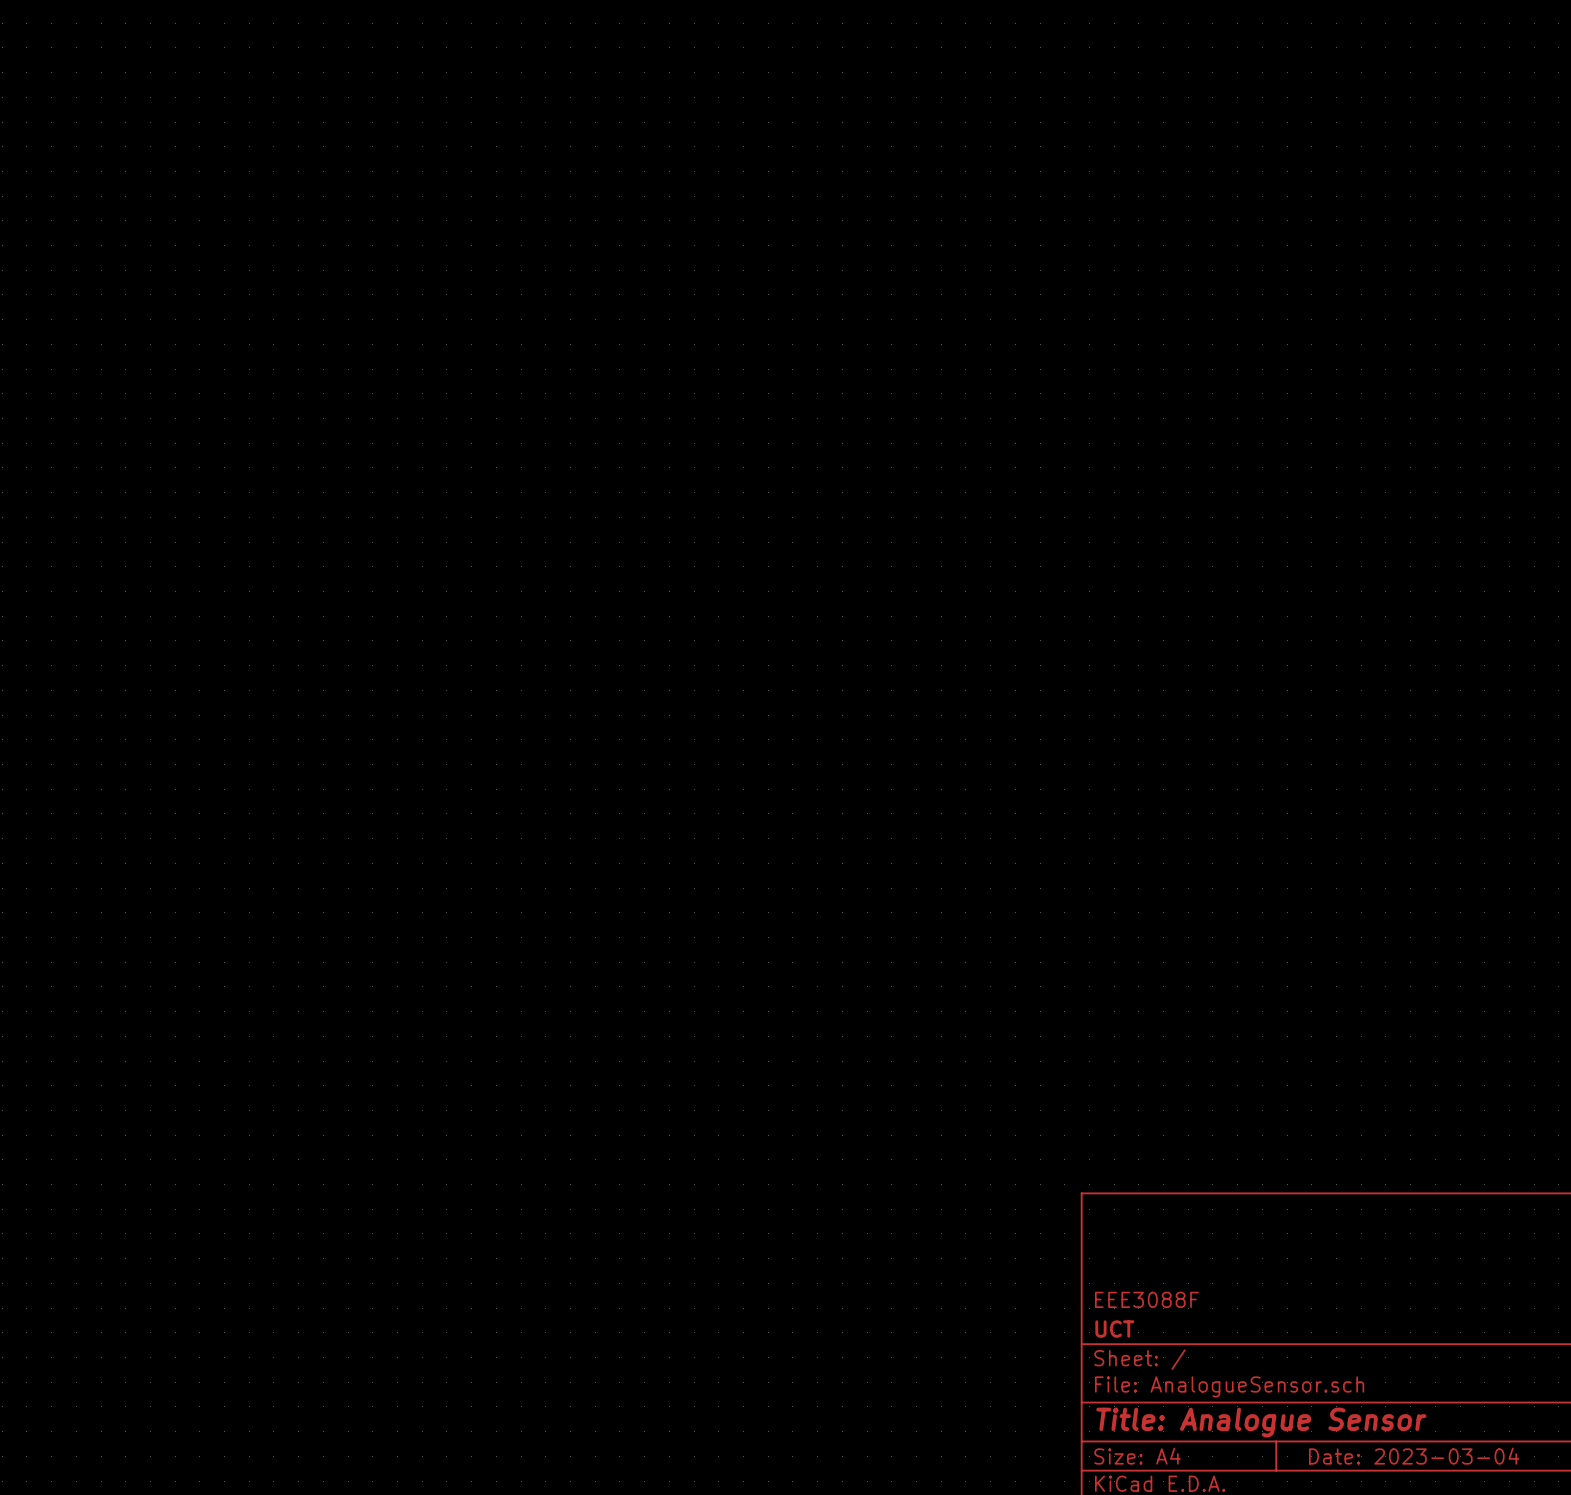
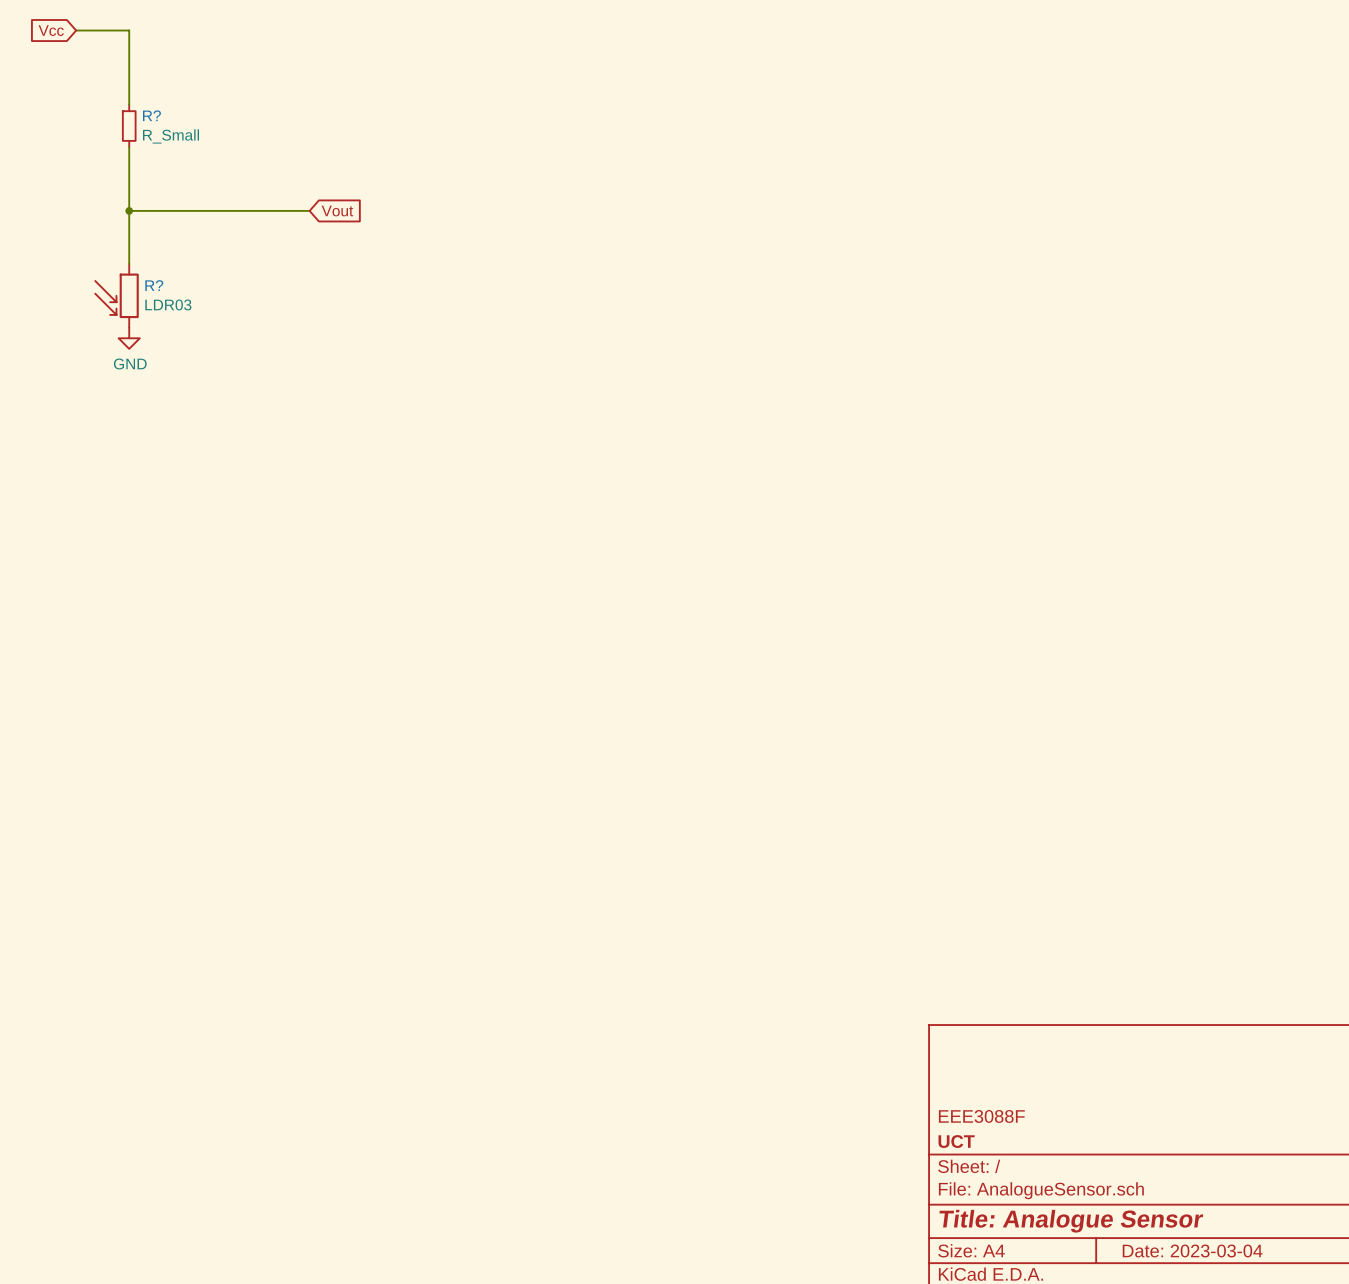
global label: none -> Vcc (51, 30)
wire: none -> (76, 30) (129, 30) (129, 104)
R?: none -> R_Small (129, 126)
wire: none -> (129, 147) (129, 263)
wire: none -> (129, 210) (309, 210)
junction: none -> (129, 210)
global label: none -> Vout (337, 211)
R?: none -> LDR03 (117, 295)
power symbol: none -> GND (129, 338)

